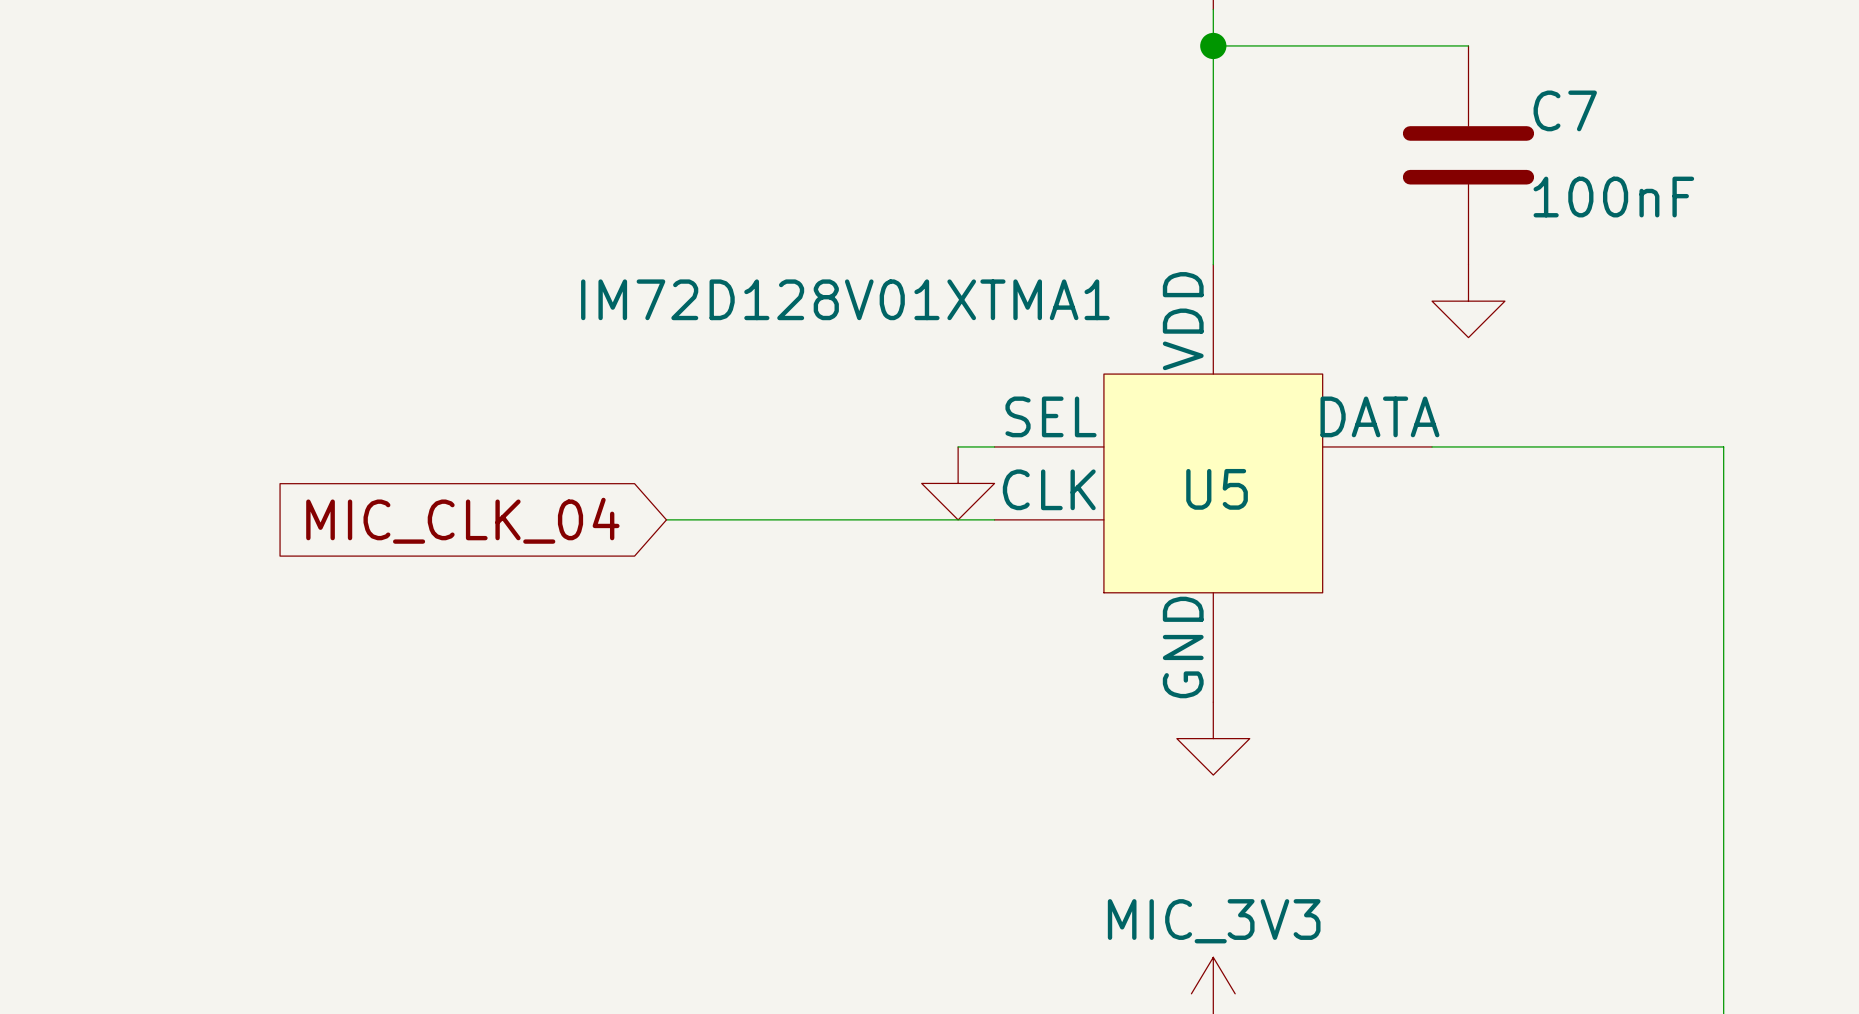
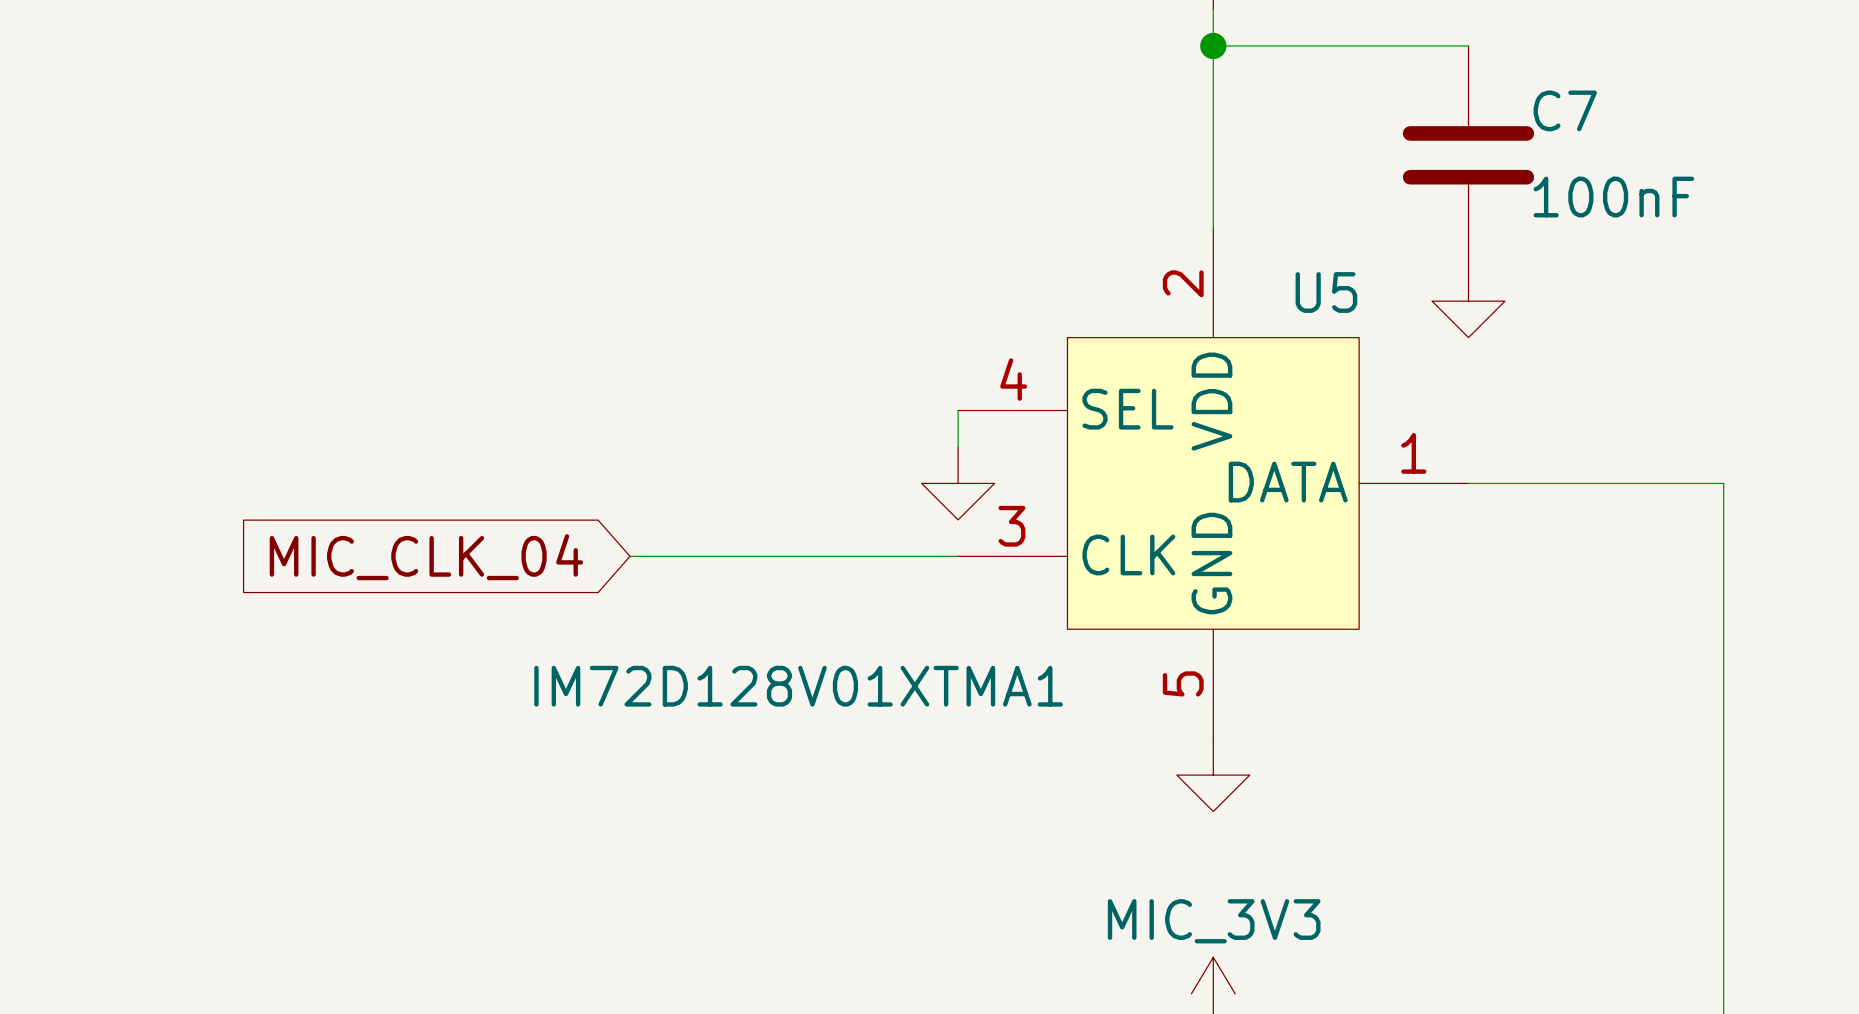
U5 symbol: [994, 264, 1433, 703] -> [958, 228, 1469, 739]
U5 value position: IM72D128V01XTMA1 (845, 299) -> IM72D128V01XTMA1 (798, 686)
wire: (958, 446) (994, 446) -> (958, 446) (958, 410)
wire: (1432, 446) (1723, 446) (1723, 483) -> (1468, 483) (1723, 483)
U5 name position: U5 (1217, 489) -> U5 (1326, 292)
wire: (666, 519) (994, 519) -> (630, 556) (958, 556)
global label position: MIC_CLK_04 (462, 520) -> MIC_CLK_04 (426, 557)
power symbol position: (1213, 738) -> (1213, 775)

